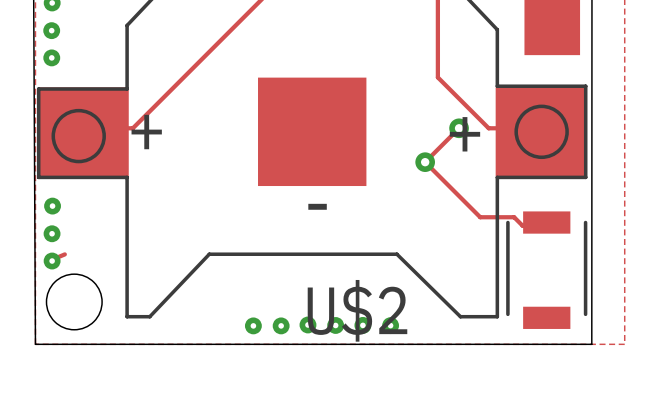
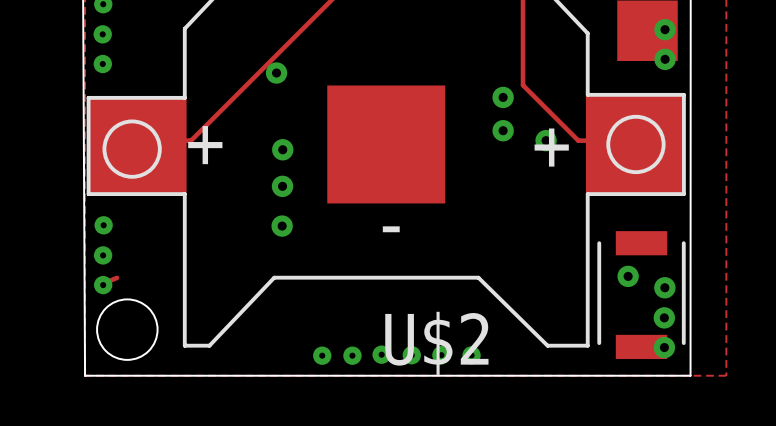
via: none -> (665, 29)
via: none -> (665, 59)
via: none -> (276, 73)
via: none -> (503, 97)
via: none -> (503, 130)
track: (459, 128) (425, 162) (480, 217) (514, 217) (522, 225) (543, 225) -> none
via: none -> (282, 149)
via: (425, 162) -> none
via: none -> (282, 186)
via: none -> (282, 226)
via: none -> (628, 276)
via: none -> (664, 287)
via: none -> (664, 317)
via: none -> (664, 347)

